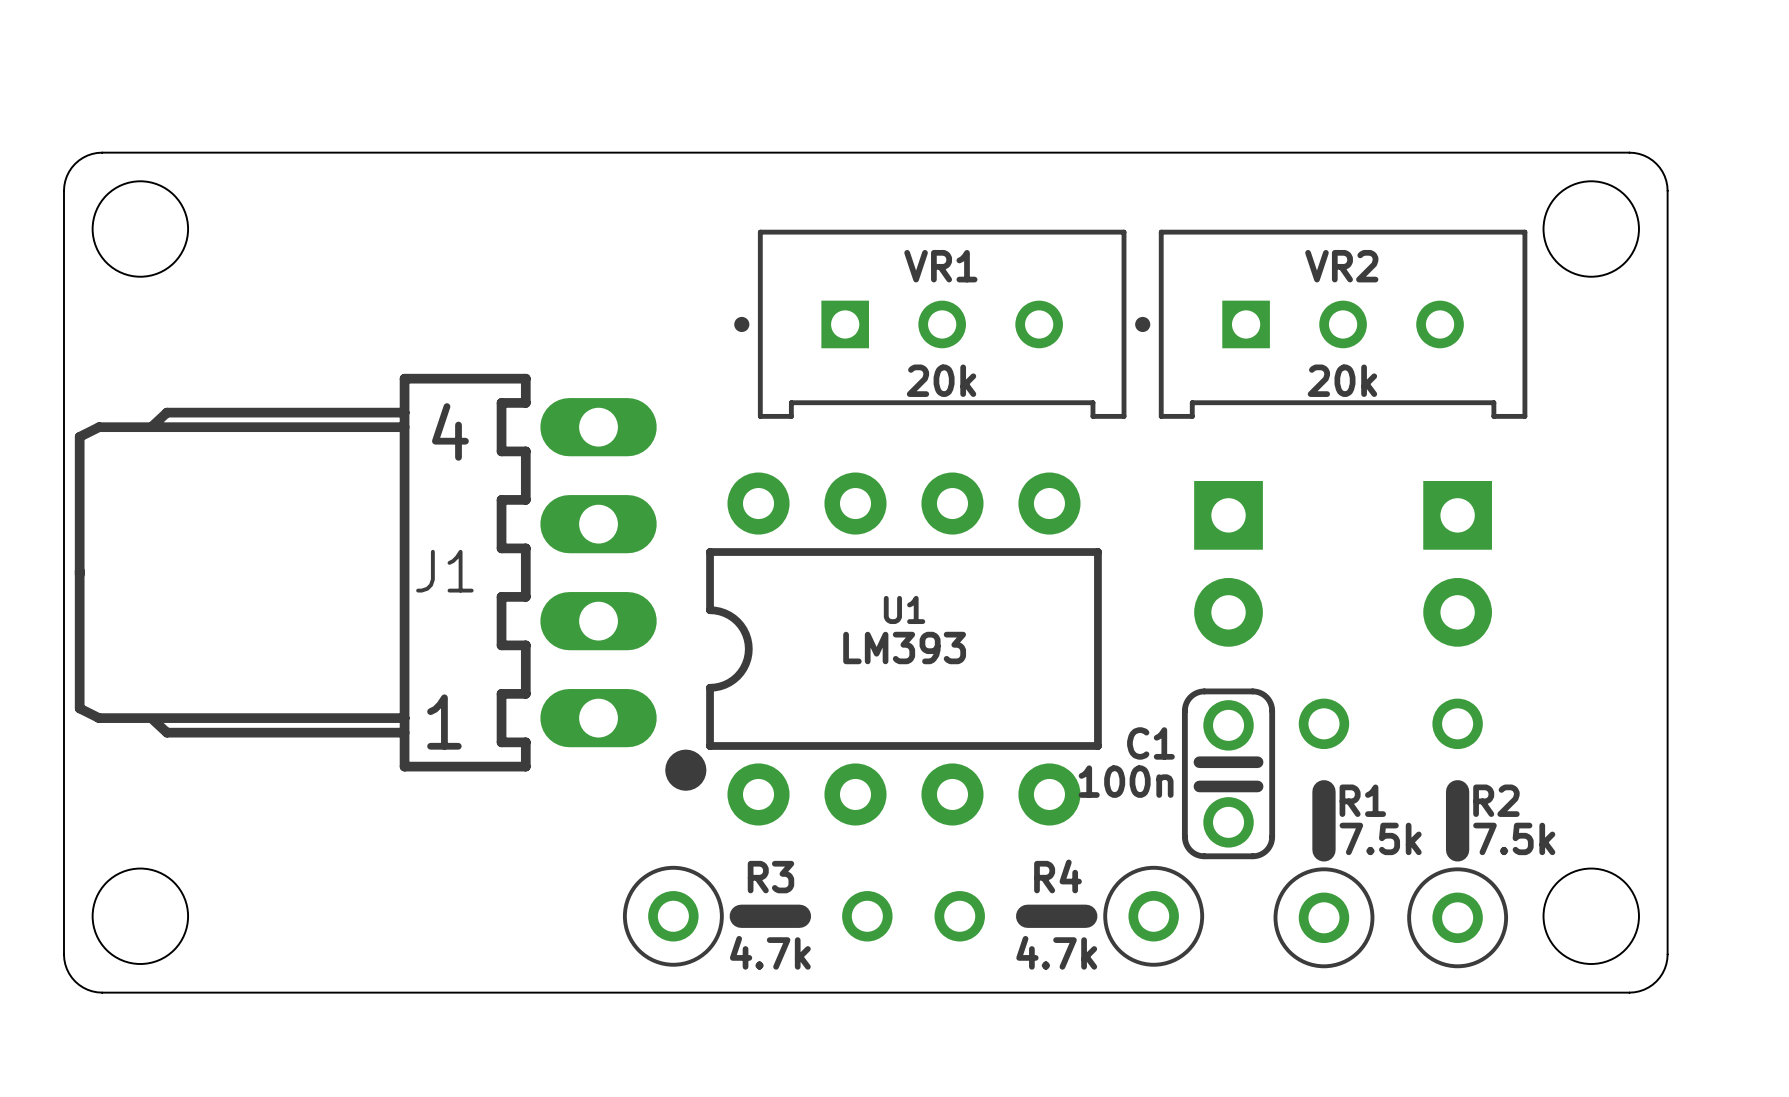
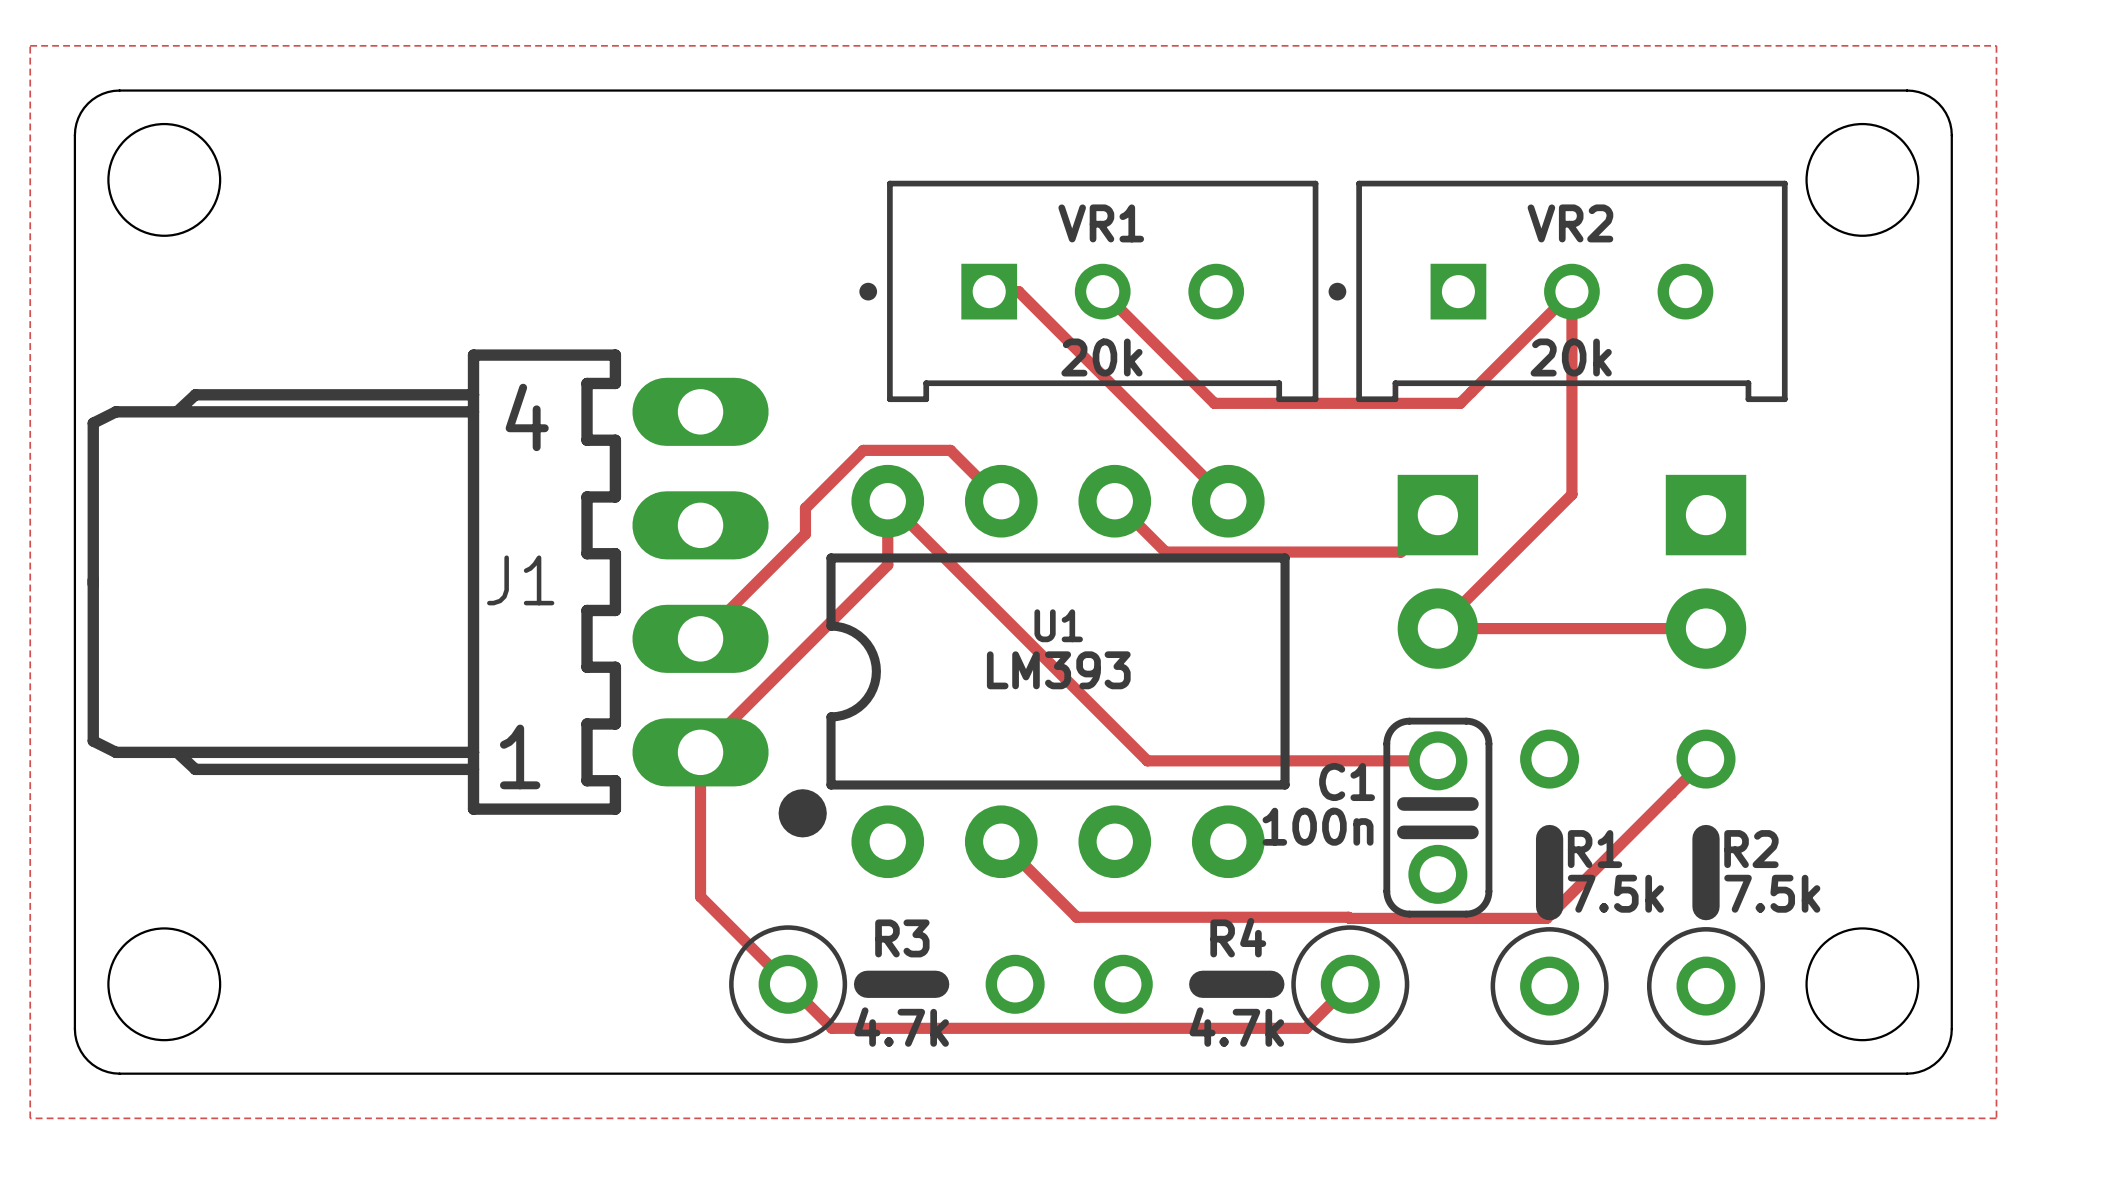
zone outline: none -> (30, 45) (30, 1118) (1996, 1118) (1996, 45) (30, 45)
track: none -> (989, 291) (1018, 291) (1228, 501)
track: none -> (1102, 291) (1214, 403) (1460, 403) (1571, 291) (1571, 494) (1437, 628) (1706, 628)
track: none -> (1001, 501) (950, 450) (863, 450) (805, 508) (805, 533) (700, 638)
track: none -> (1114, 501) (1165, 552) (1400, 552) (1437, 515)
track: none -> (1706, 759) (1546, 918) (1076, 917) (1001, 841)
track: none -> (1437, 760) (1147, 760) (887, 501) (887, 565) (700, 752) (700, 896) (832, 1028) (1306, 1028) (1350, 984)

